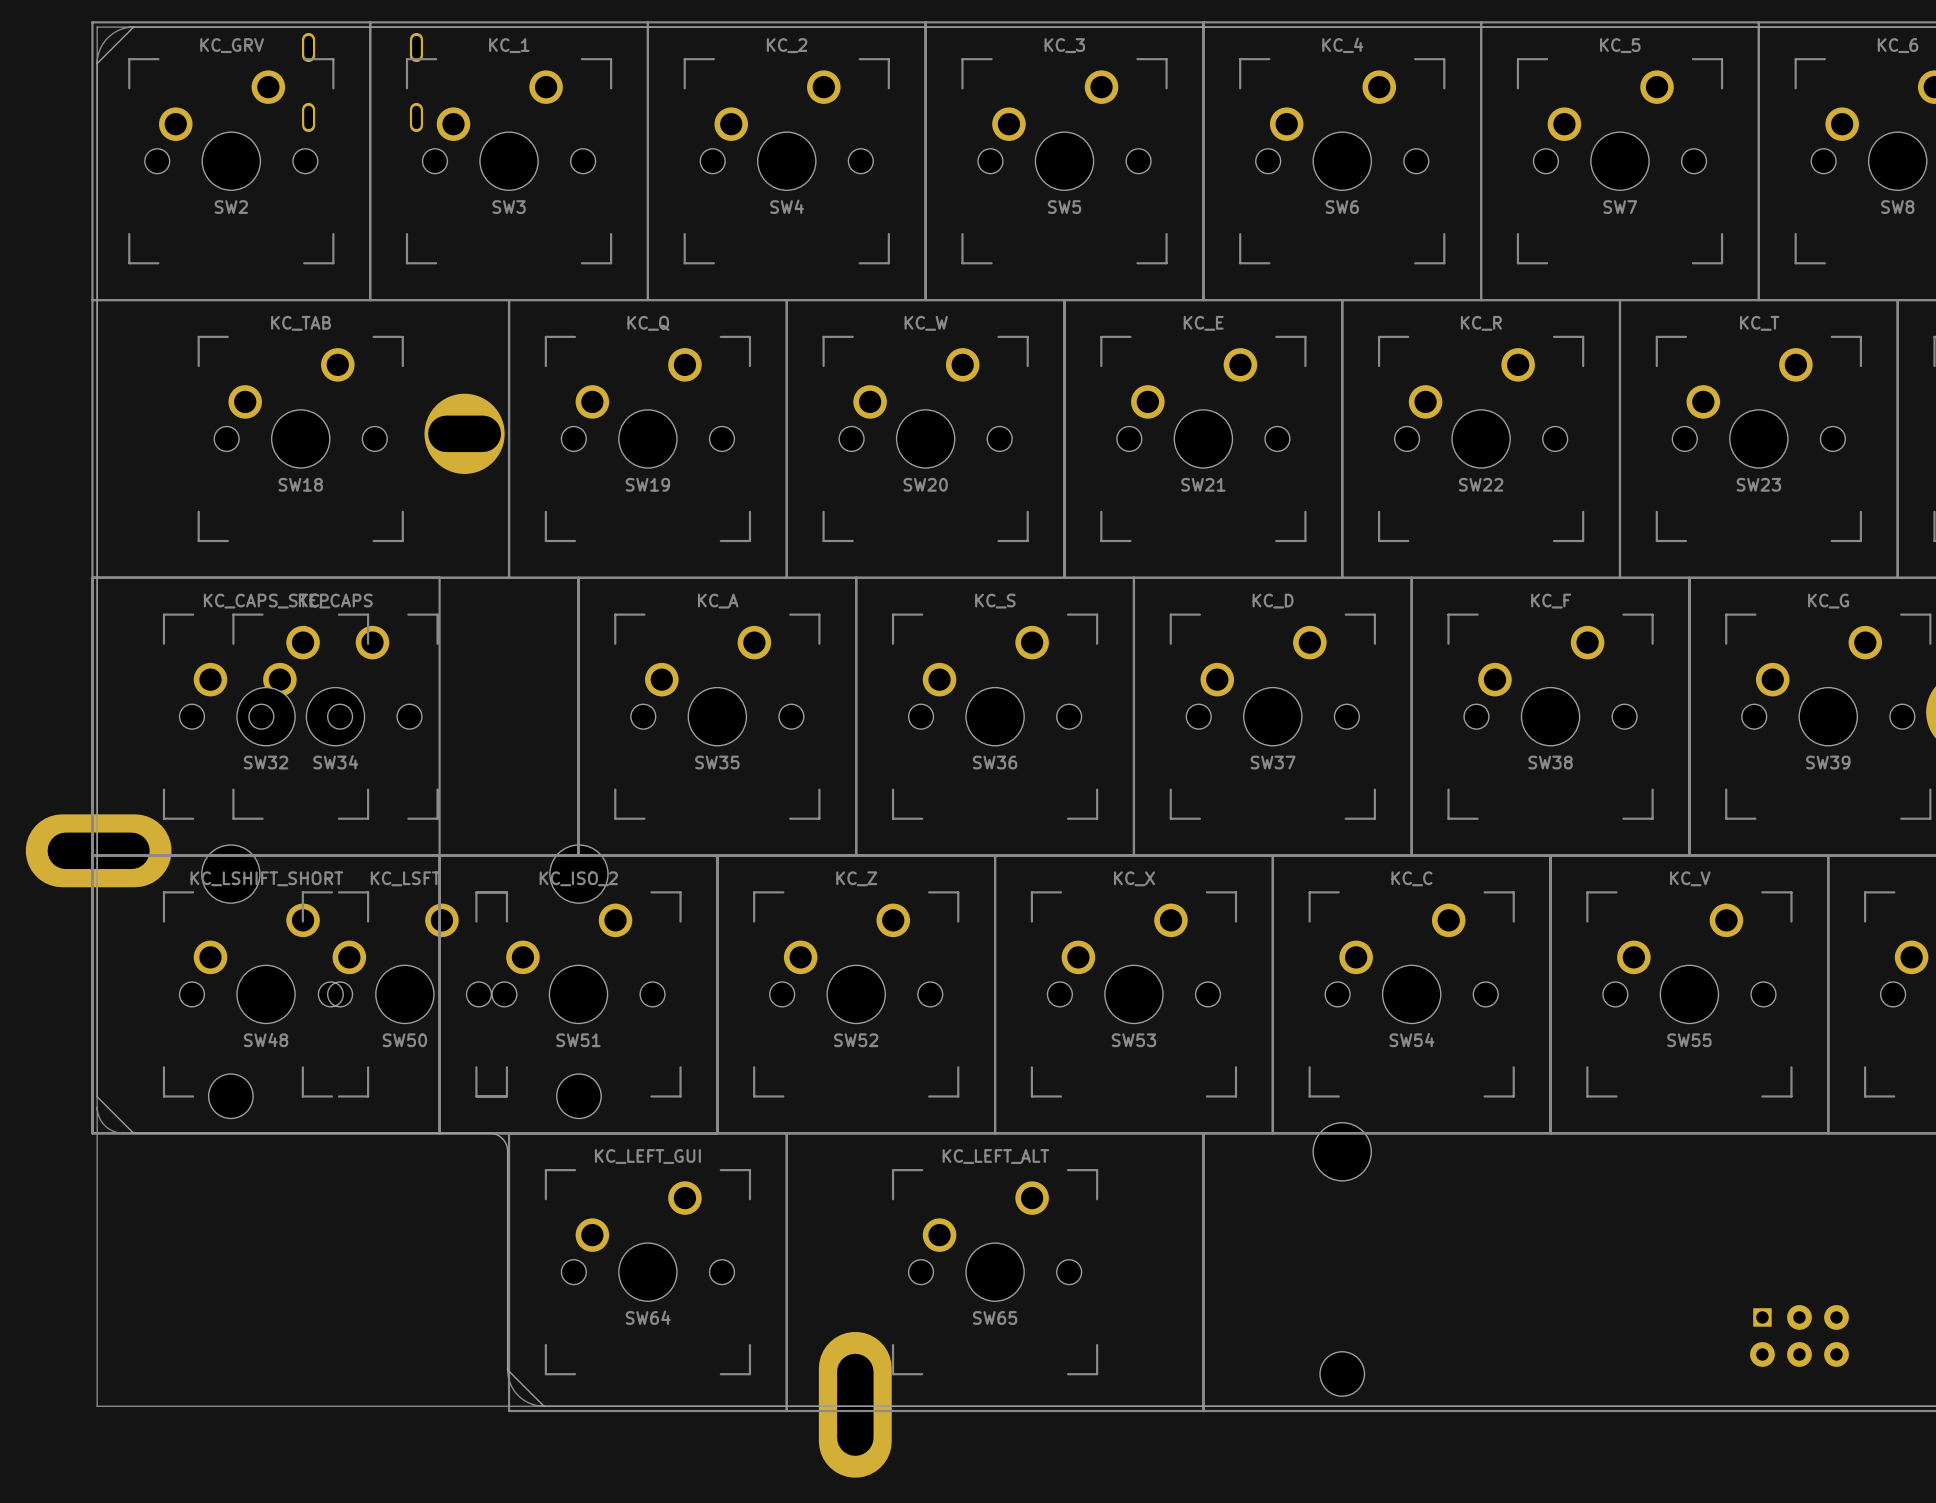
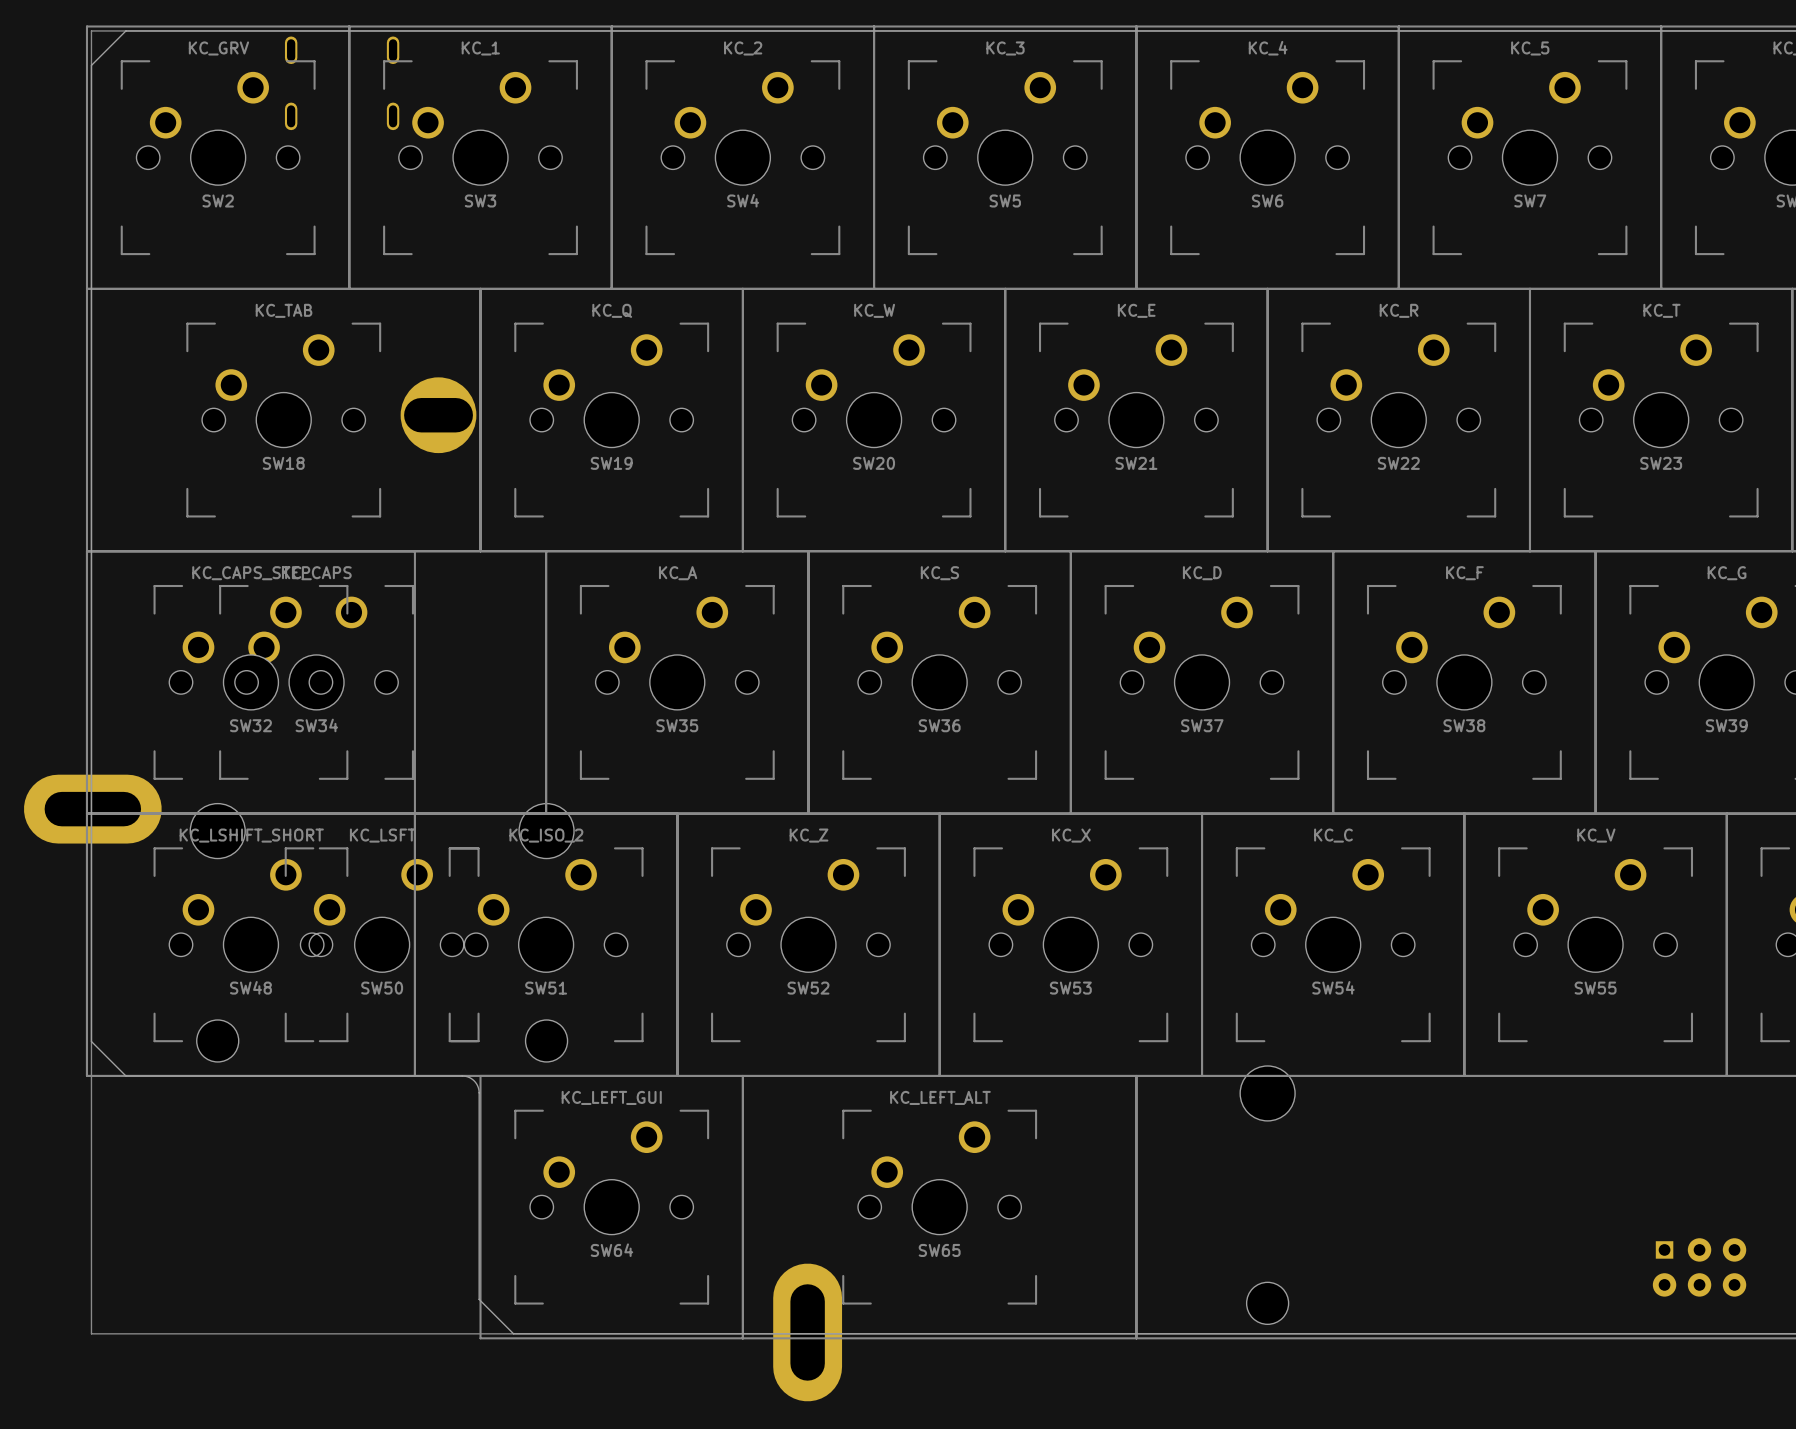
line: (133, 27) (121, 29) (107, 37) (99, 51) (97, 63) -> none
line: (97, 1107) (99, 1118) (104, 1125) (114, 1131) (123, 1133) -> none
line: (507, 1369) (511, 1385) (518, 1395) (532, 1404) (544, 1406) -> none

